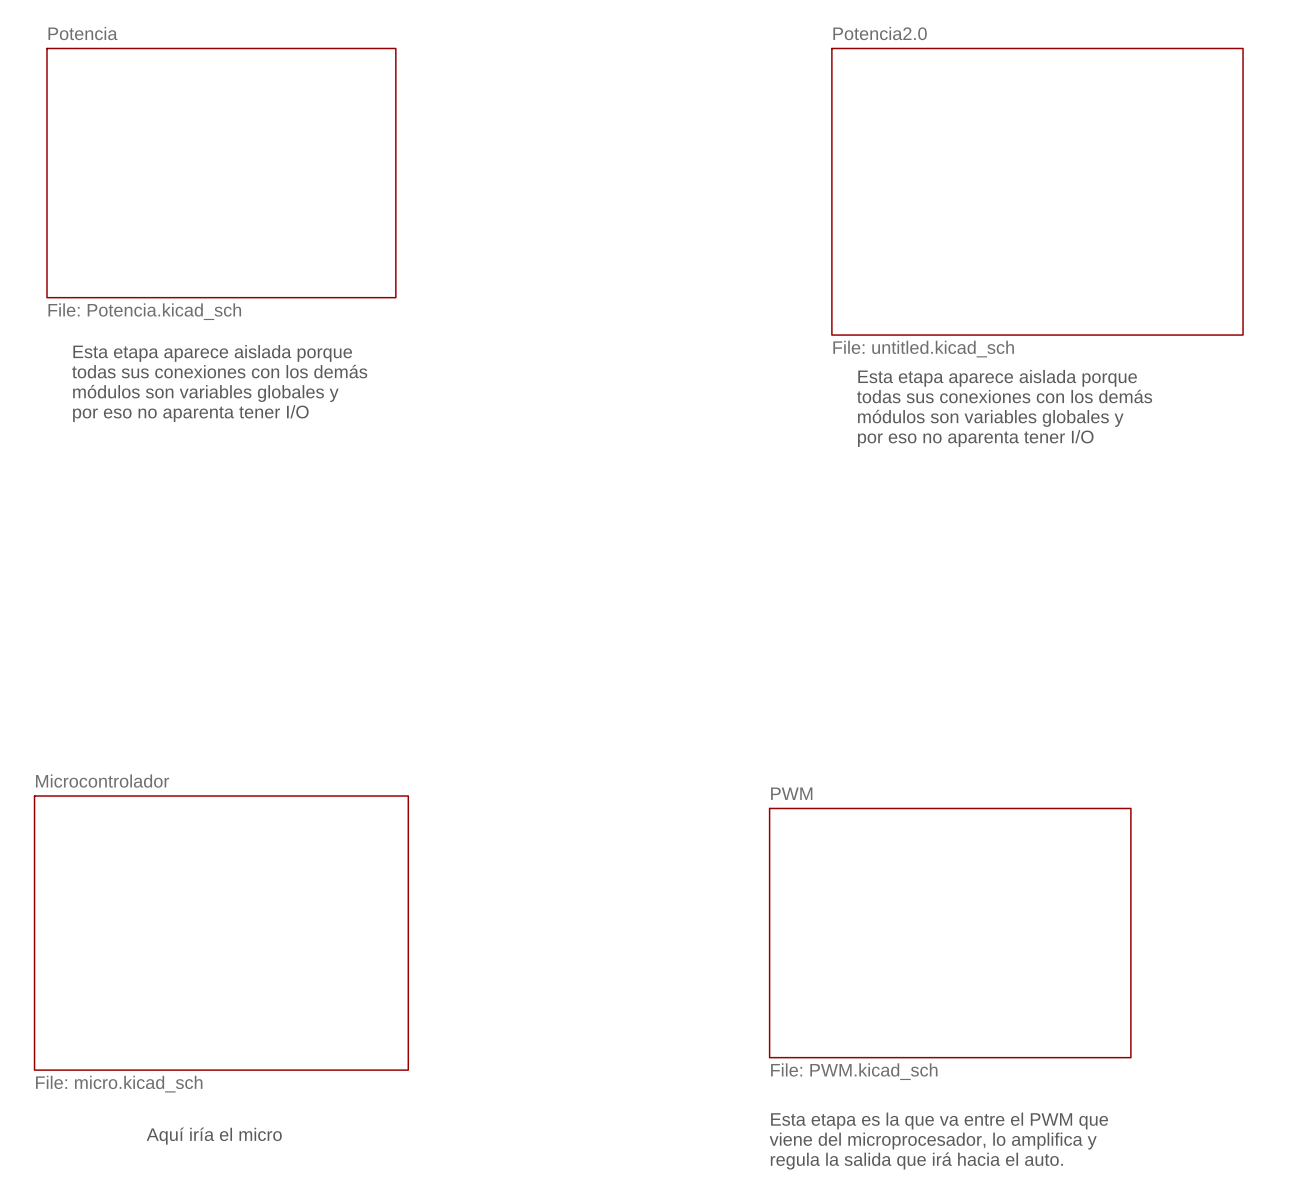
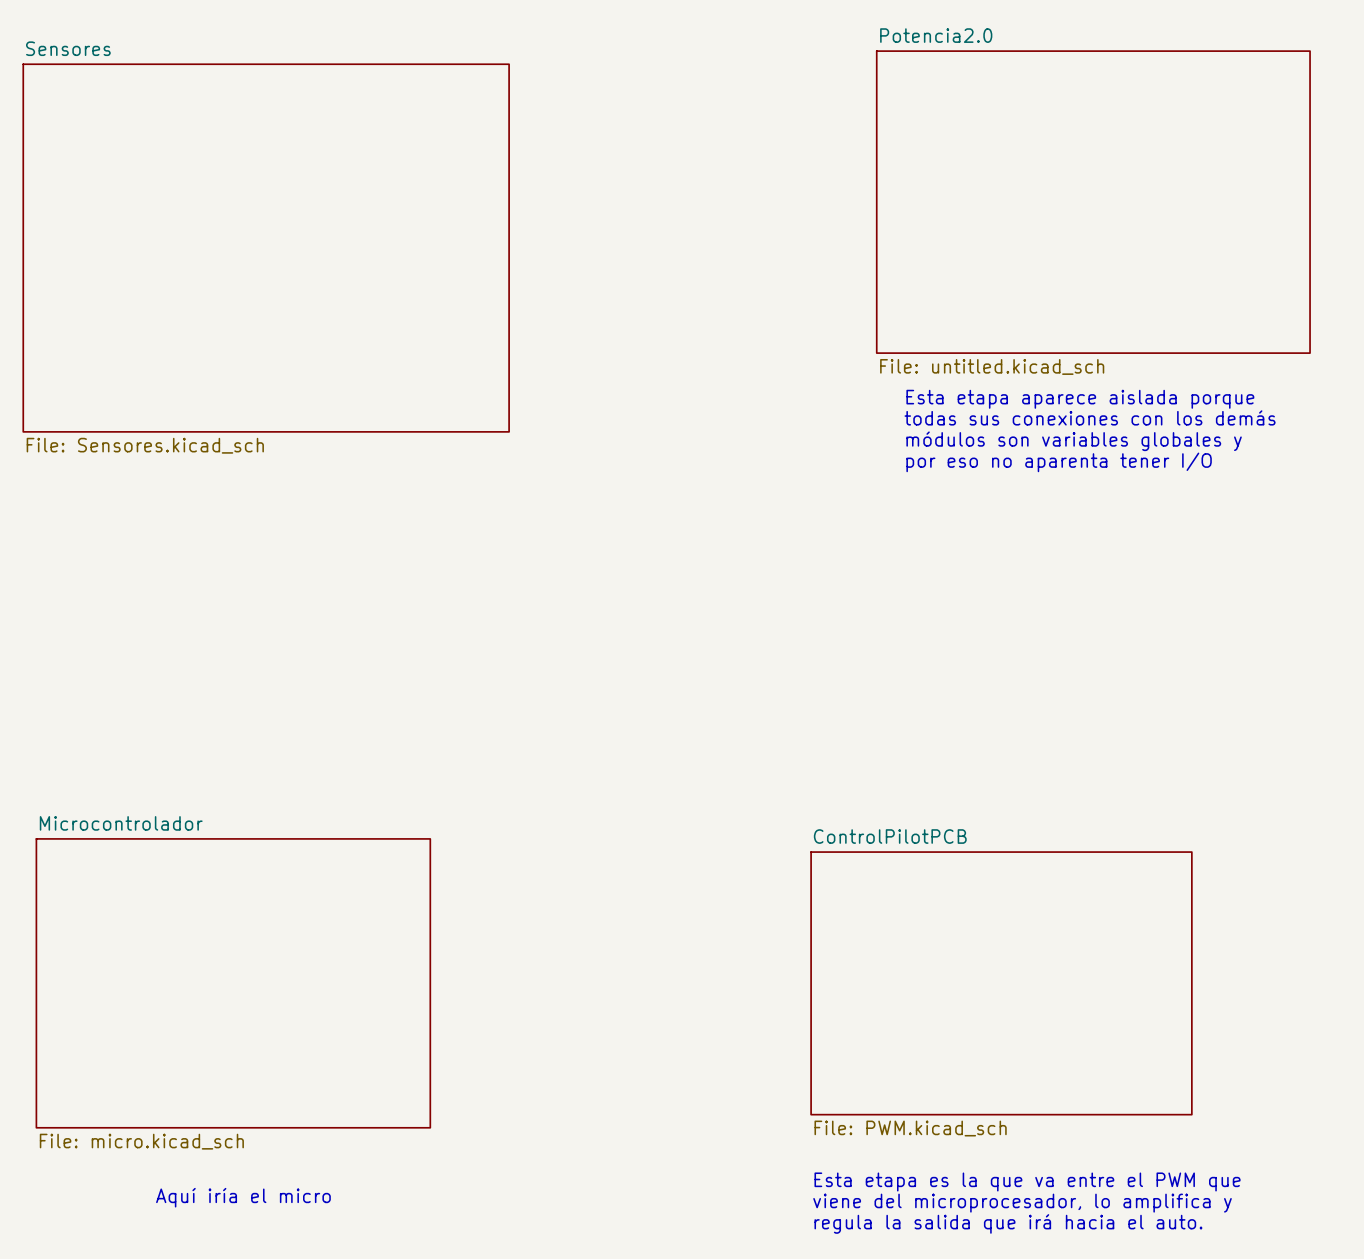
sheet Potencia: File: Potencia.kicad_sch (221, 173) -> none
sheet Sensores: none -> File: Sensores.kicad_sch (266, 248)
text: Esta etapa aparece aislada porque (212, 353) -> none
text: todas sus conexiones con los demás (219, 371) -> none
text: módulos son variables globales y (205, 393) -> none
text: por eso no aparenta tener I/O (190, 413) -> none
sheet PWM name: PWM (791, 793) -> ControlPilotPCB (890, 836)

